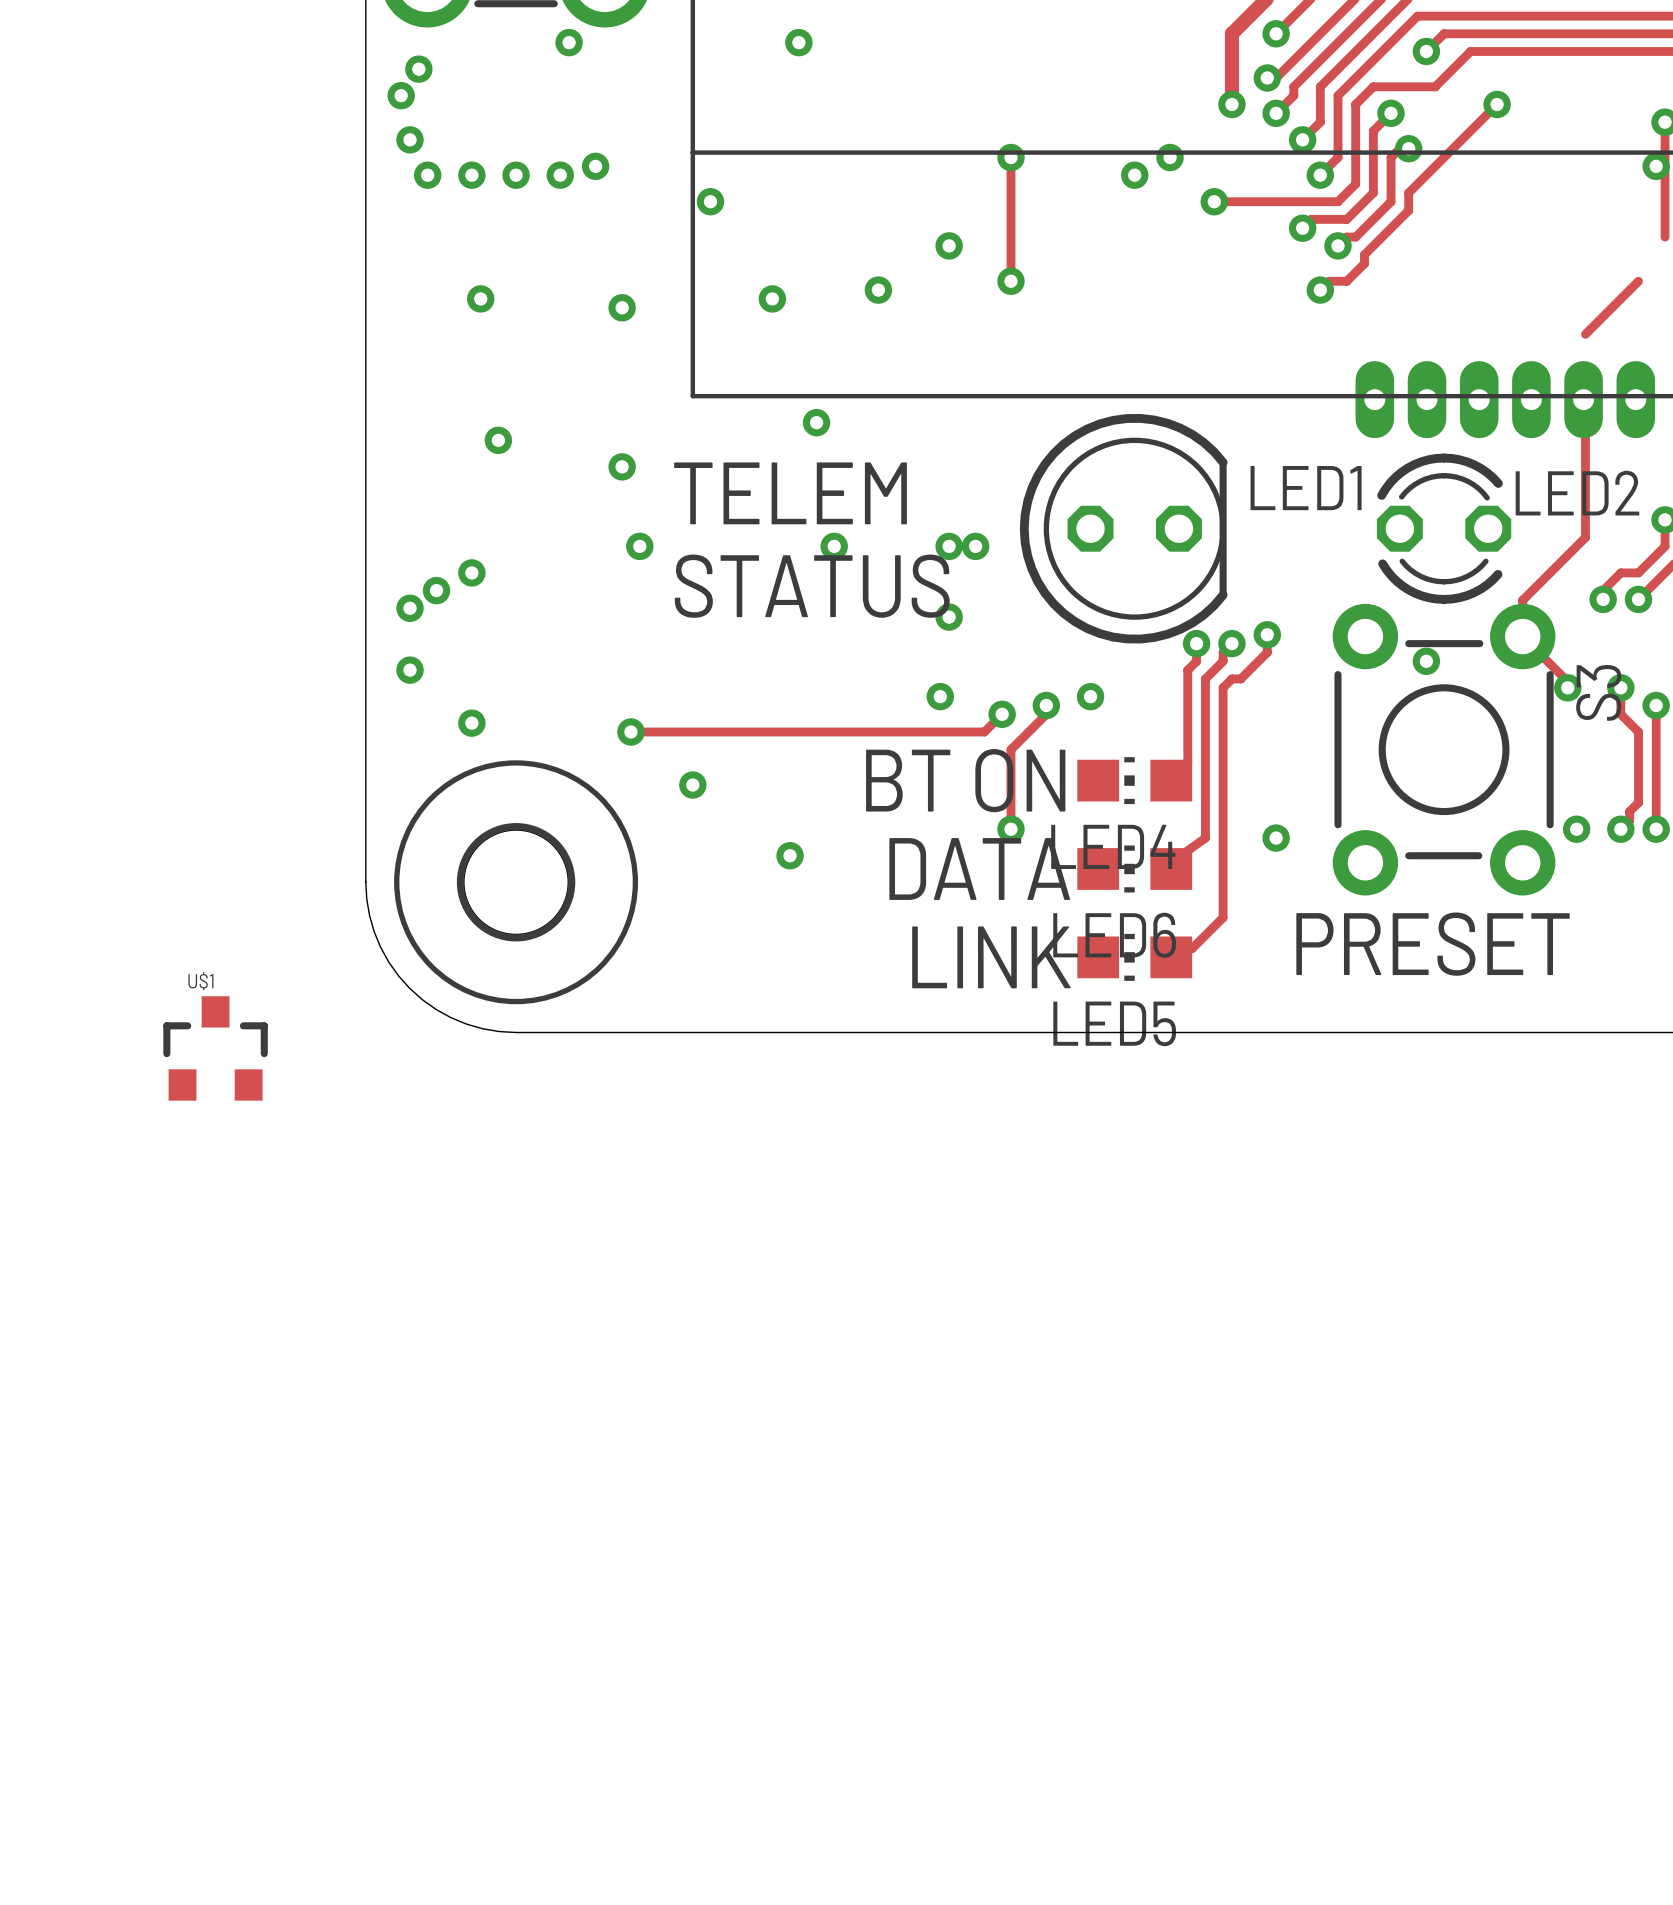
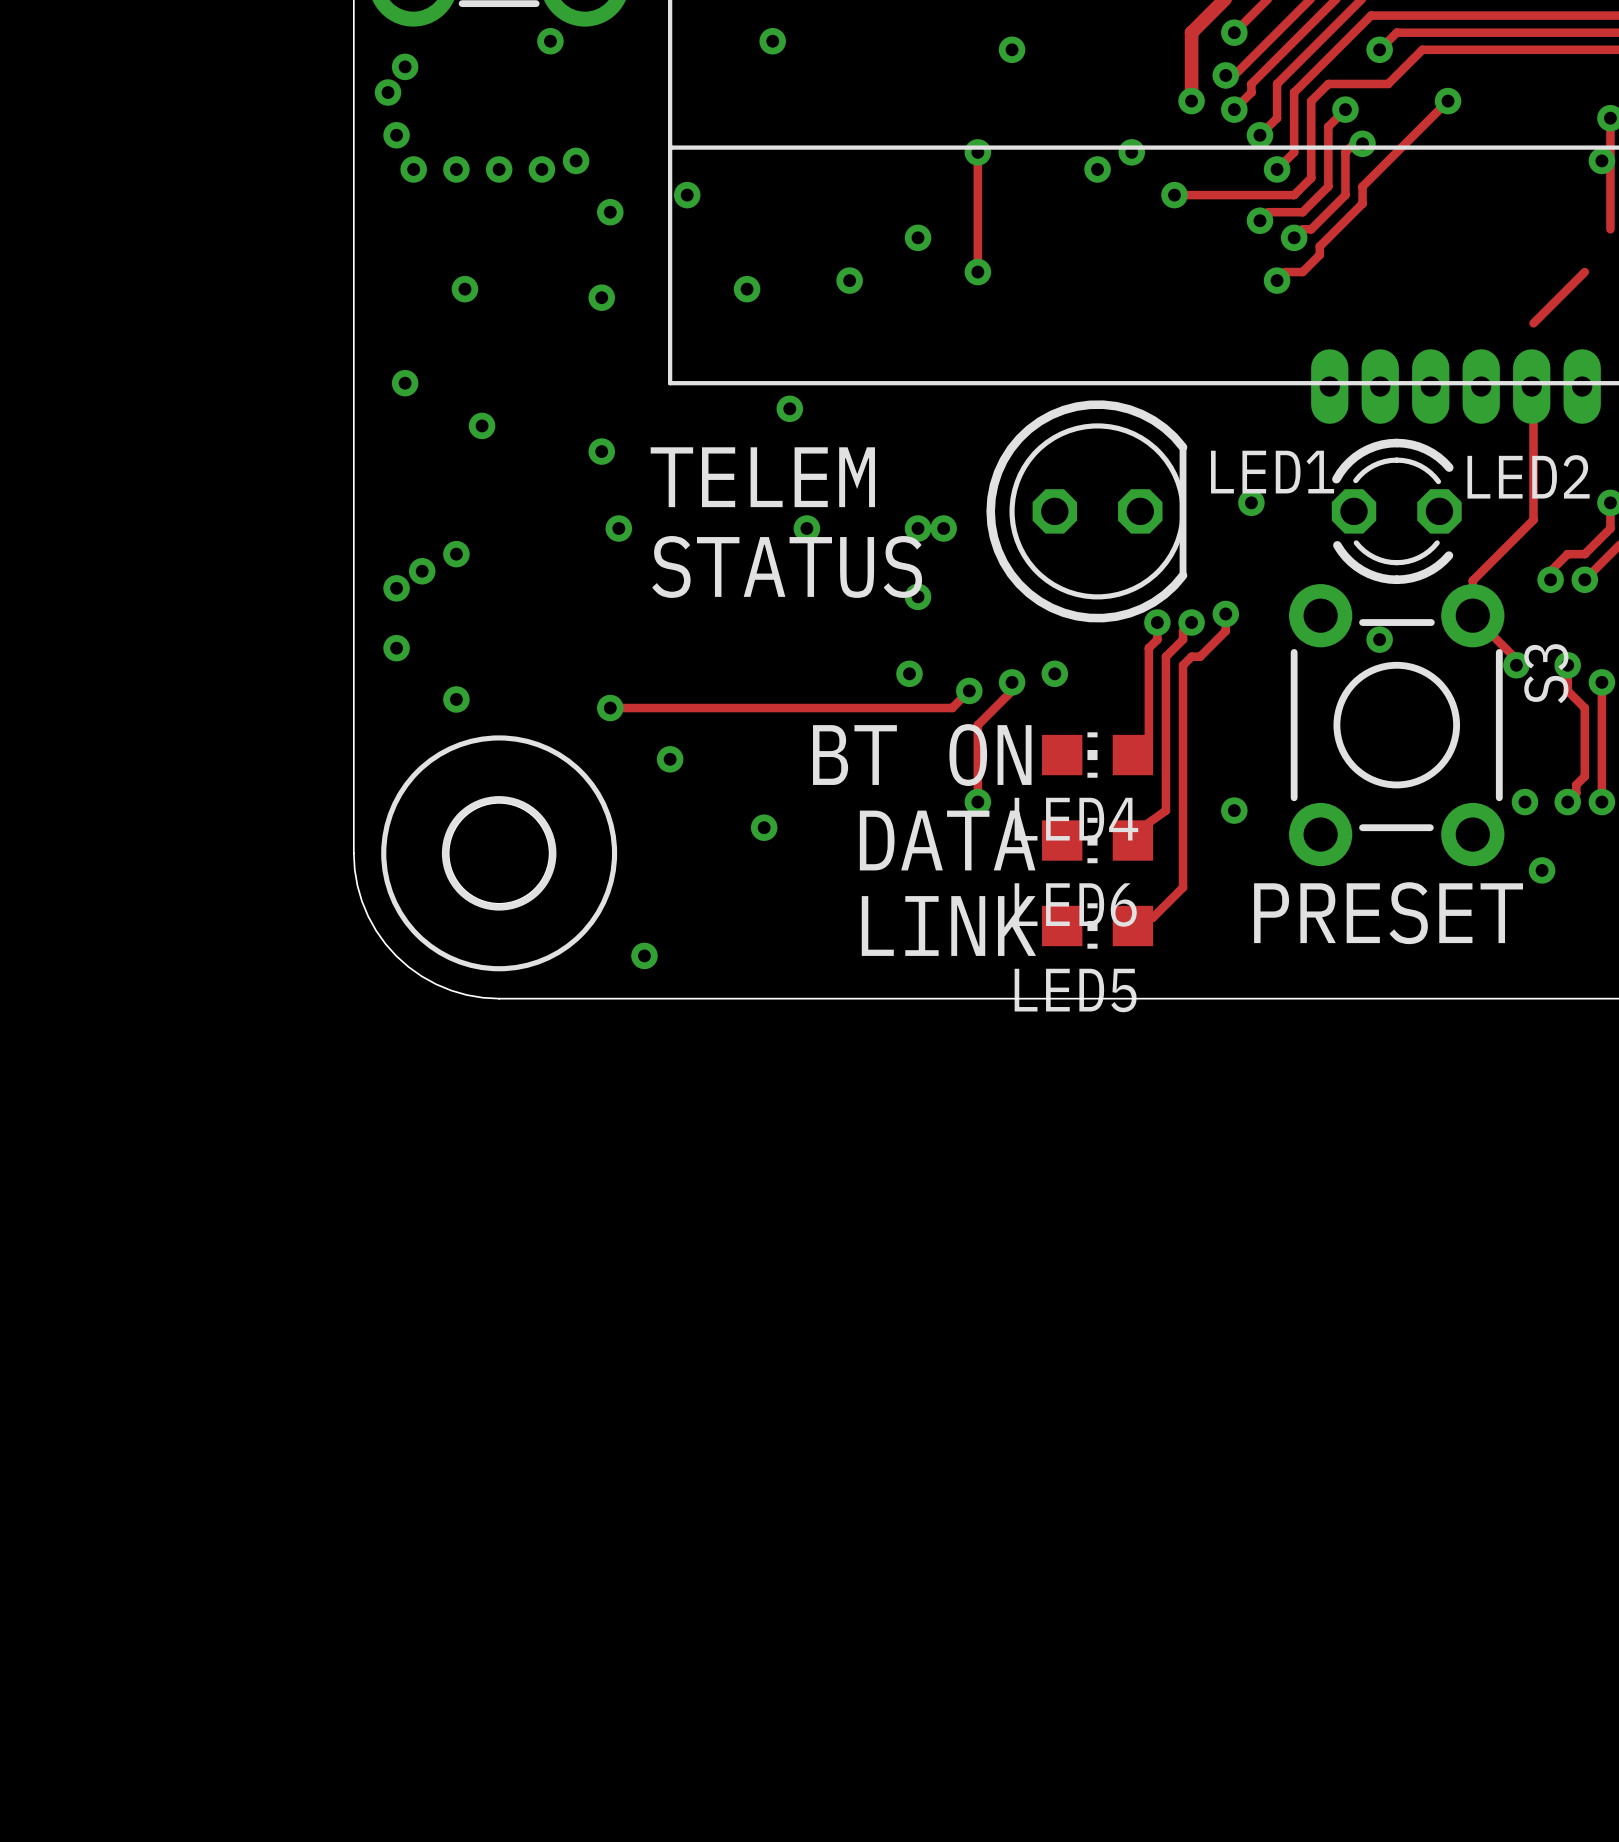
via: none -> (1012, 49)
via: none -> (610, 212)
via: none -> (405, 383)
via: none -> (1251, 502)
via: none -> (1542, 870)
via: none -> (644, 955)
U$1: (215, 1048) -> none

